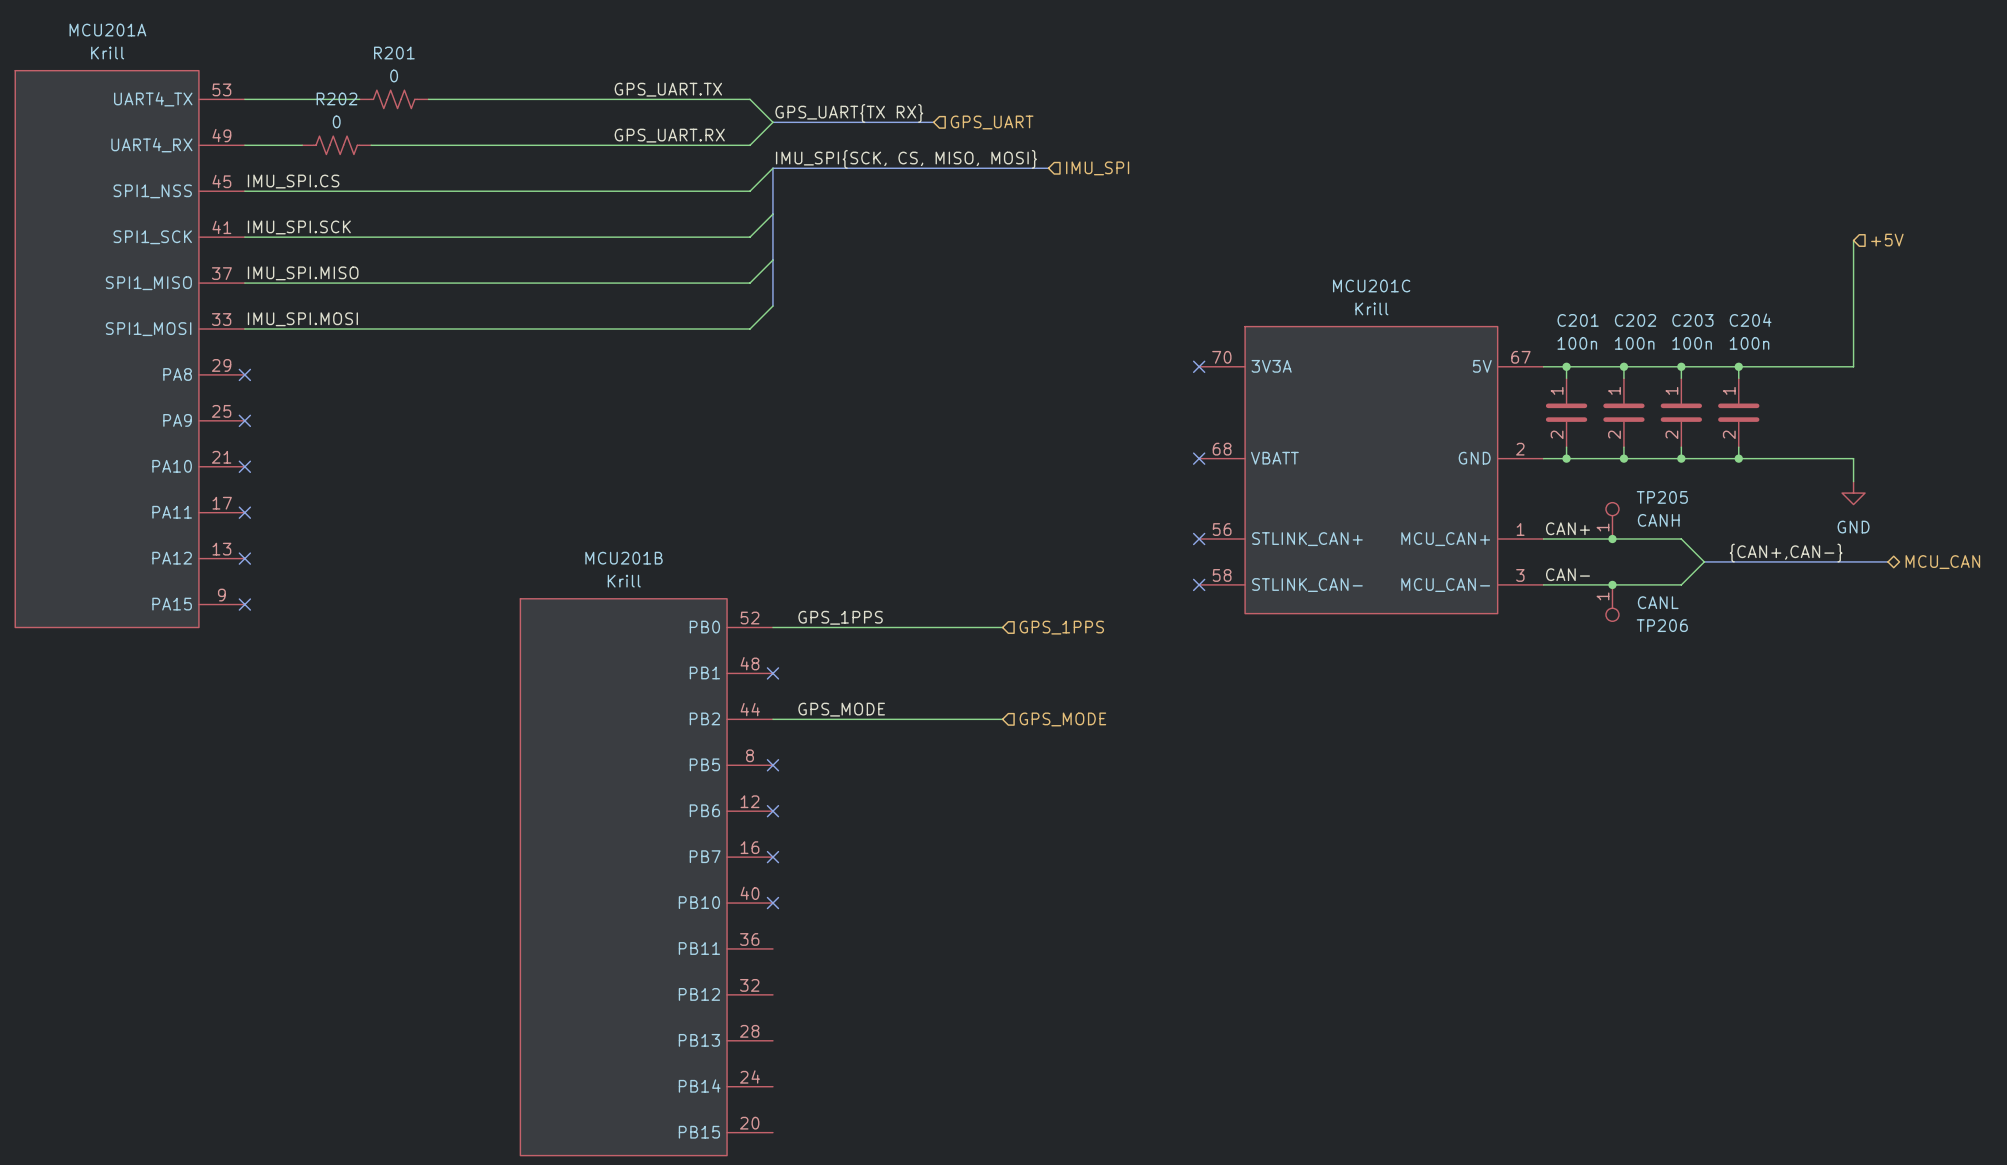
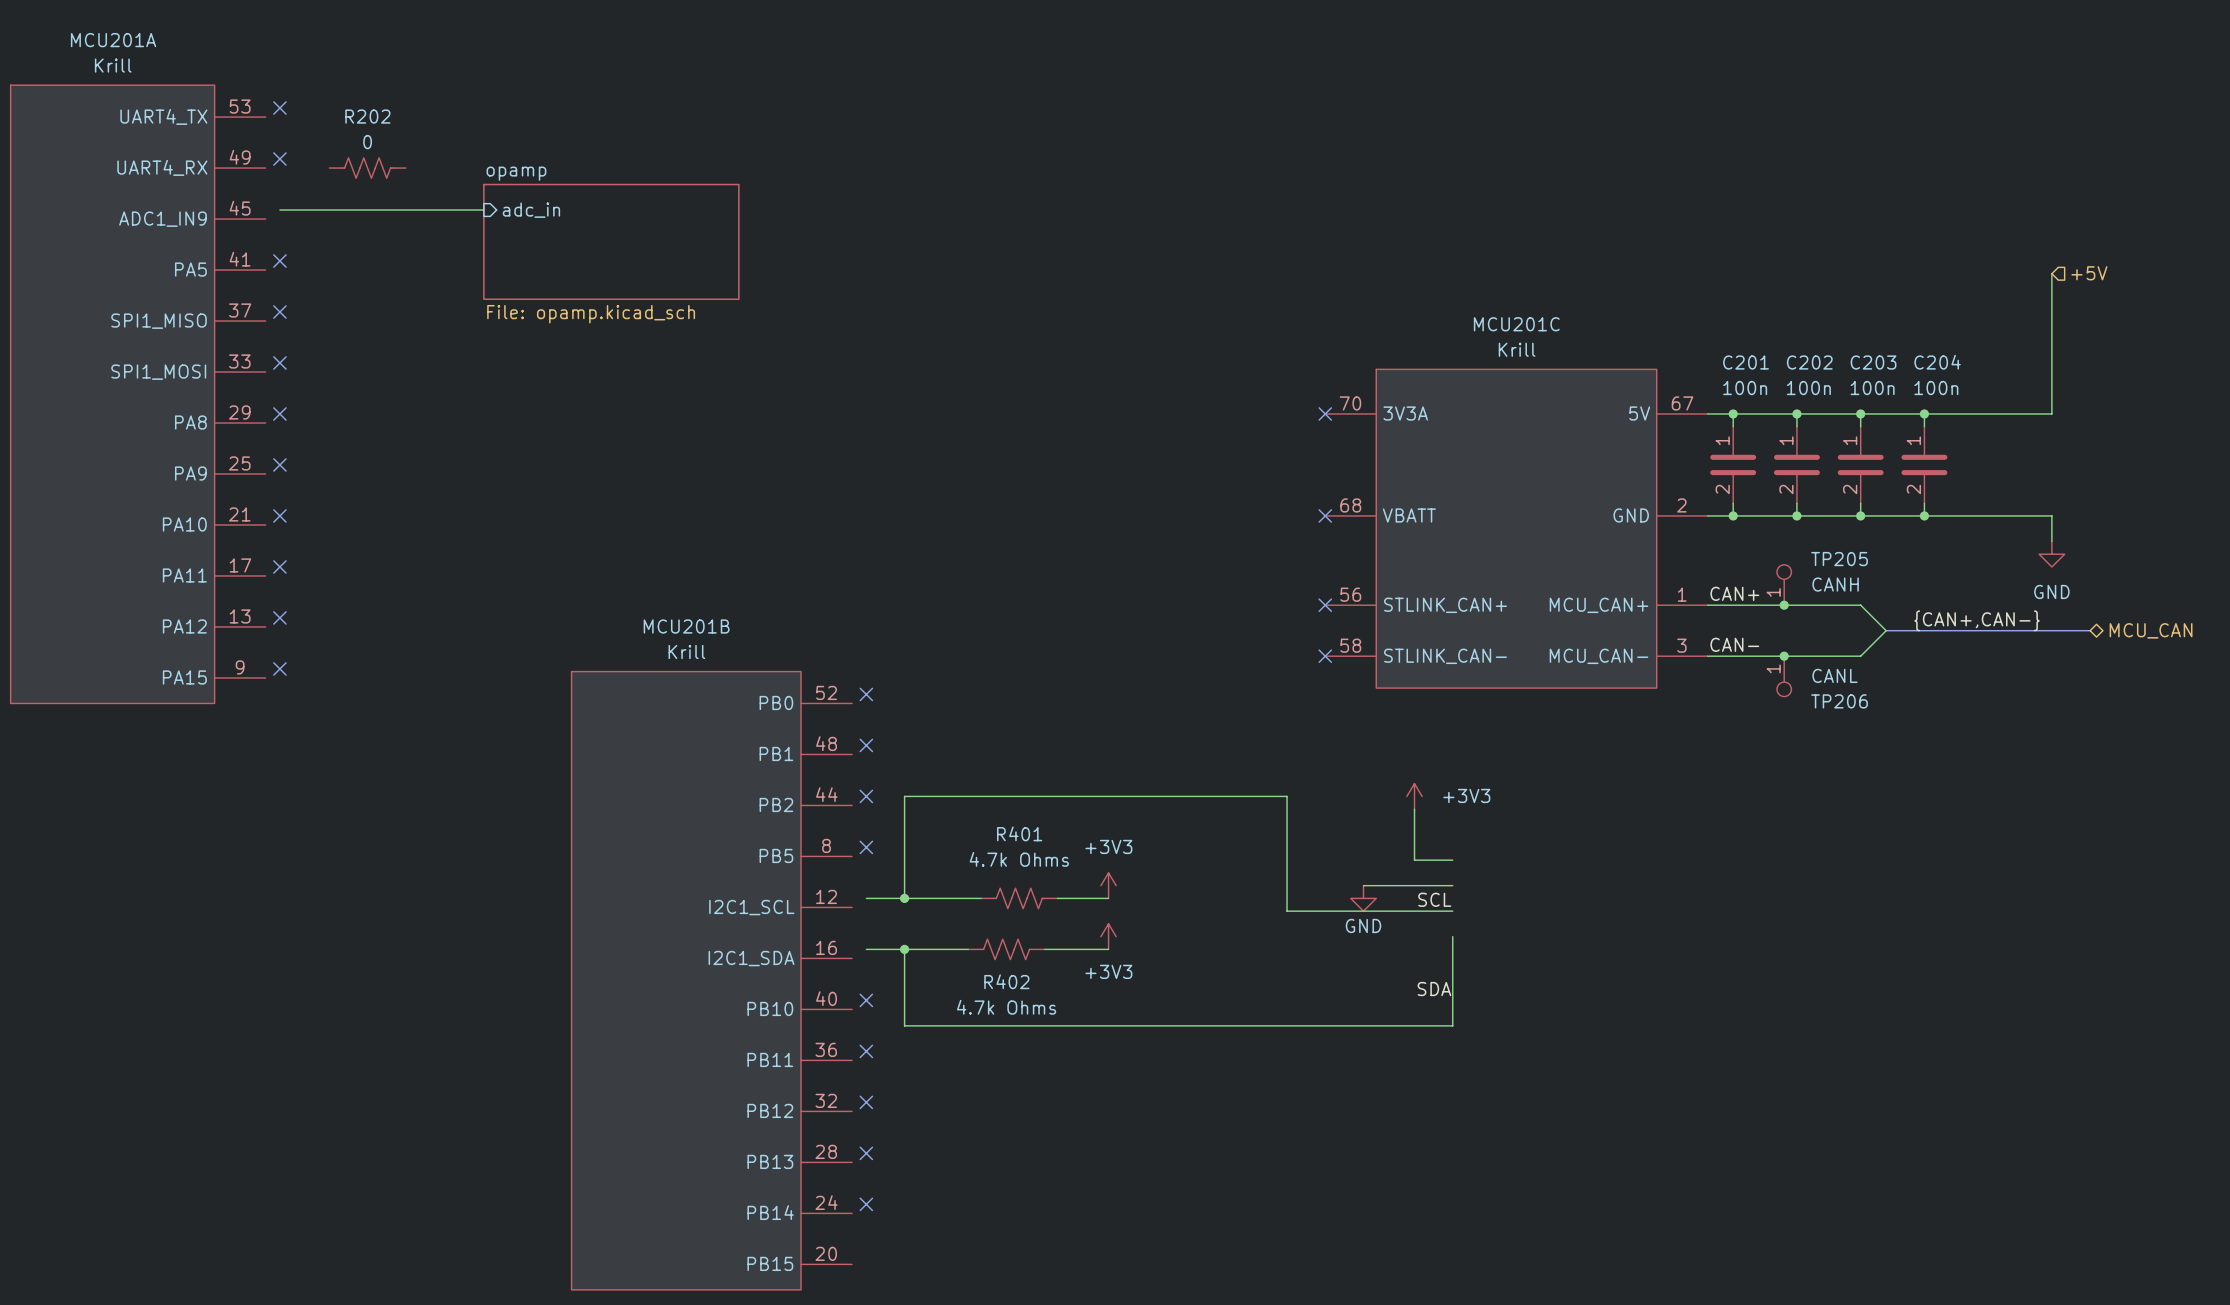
label: GPS_UART.TX (668, 89) -> none
no-connect mark: none -> (279, 108)
wire: (244, 99) (359, 99) -> none
R201: 0 (394, 99) -> none
wire: (428, 99) (750, 99) (772, 122) (750, 145) (371, 145) -> none
label: GPS_UART{TX RX} (849, 113) -> none
bus: (772, 122) (933, 122) -> none
hierarchical label: GPS_UART (992, 122) -> none
label: GPS_UART.RX (669, 135) -> none
no-connect mark: none -> (279, 159)
wire: (244, 145) (302, 145) -> none
label: IMU_SPI{SCK, CS, MISO, MOSI} (906, 159) -> none
wire: (772, 168) (750, 191) (244, 191) -> none
bus: (1048, 168) (772, 168) (772, 306) -> none
hierarchical label: IMU_SPI (1097, 168) -> none
label: IMU_SPI.CS (293, 181) -> none
wire: none -> (279, 210) (483, 210)
sheet pin: none -> adc_in (531, 210)
MCU201A pin name: SPI1_NSS (152, 191) -> ADC1_IN9 (162, 219)
sheet opamp: none -> File: opamp.kicad_sch (611, 241)
wire: (772, 214) (750, 237) (244, 237) -> none
label: IMU_SPI.SCK (299, 227) -> none
no-connect mark: none -> (279, 261)
MCU201A pin name: SPI1_SCK (152, 237) -> PA5 (190, 269)
wire: (772, 260) (750, 283) (244, 283) -> none
label: IMU_SPI.MISO (303, 273) -> none
no-connect mark: none -> (279, 312)
wire: (772, 306) (750, 328) (244, 328) -> none
label: IMU_SPI.MOSI (302, 319) -> none
no-connect mark: none -> (279, 362)
no-connect mark position: (244, 374) -> (279, 413)
no-connect mark position: (244, 420) -> (279, 464)
no-connect mark position: (244, 466) -> (279, 515)
no-connect mark position: (244, 512) -> (279, 566)
no-connect mark position: (244, 558) -> (279, 617)
no-connect mark position: (244, 604) -> (279, 668)
label: GPS_1PPS (840, 617) -> none
no-connect mark: none -> (866, 694)
wire: (772, 627) (1002, 627) -> none
hierarchical label: GPS_1PPS (1061, 627) -> none
no-connect mark position: (772, 673) -> (866, 745)
label: GPS_MODE (841, 709) -> none
no-connect mark: none -> (866, 796)
power symbol: none -> +3V3 (1414, 796)
wire: (772, 719) (1002, 719) -> none
hierarchical label: GPS_MODE (1062, 719) -> none
wire: none -> (1414, 809) (1414, 860) (1452, 860)
no-connect mark position: (772, 765) -> (866, 847)
power symbol: none -> +3V3 (1108, 885)
wire: none -> (1363, 885) (1452, 885)
wire: none -> (866, 898) (981, 898)
wire: none -> (904, 898) (904, 796) (1287, 796) (1287, 911) (1452, 911)
junction: none -> (904, 898)
R401: none -> 4.7k Ohms (1019, 898)
wire: none -> (1057, 898) (1108, 898)
power symbol: none -> GND (1363, 898)
label: none -> SCL (1434, 899)
MCU201B pin name: PB6 (704, 810) -> I2C1_SCL (751, 907)
no-connect mark: (772, 811) -> none
power symbol: none -> +3V3 (1108, 936)
wire: none -> (1452, 936) (1452, 1025) (904, 1025) (904, 949)
wire: none -> (866, 949) (968, 949)
junction: none -> (904, 949)
R402: none -> 4.7k Ohms (1006, 949)
wire: none -> (1044, 949) (1108, 949)
MCU201B pin name: PB7 (705, 856) -> I2C1_SDA (751, 958)
no-connect mark: (772, 857) -> none
label: none -> SDA (1434, 989)
no-connect mark position: (772, 903) -> (866, 1000)
no-connect mark: none -> (866, 1051)
no-connect mark: none -> (866, 1102)
no-connect mark: none -> (866, 1153)
no-connect mark: none -> (866, 1204)

